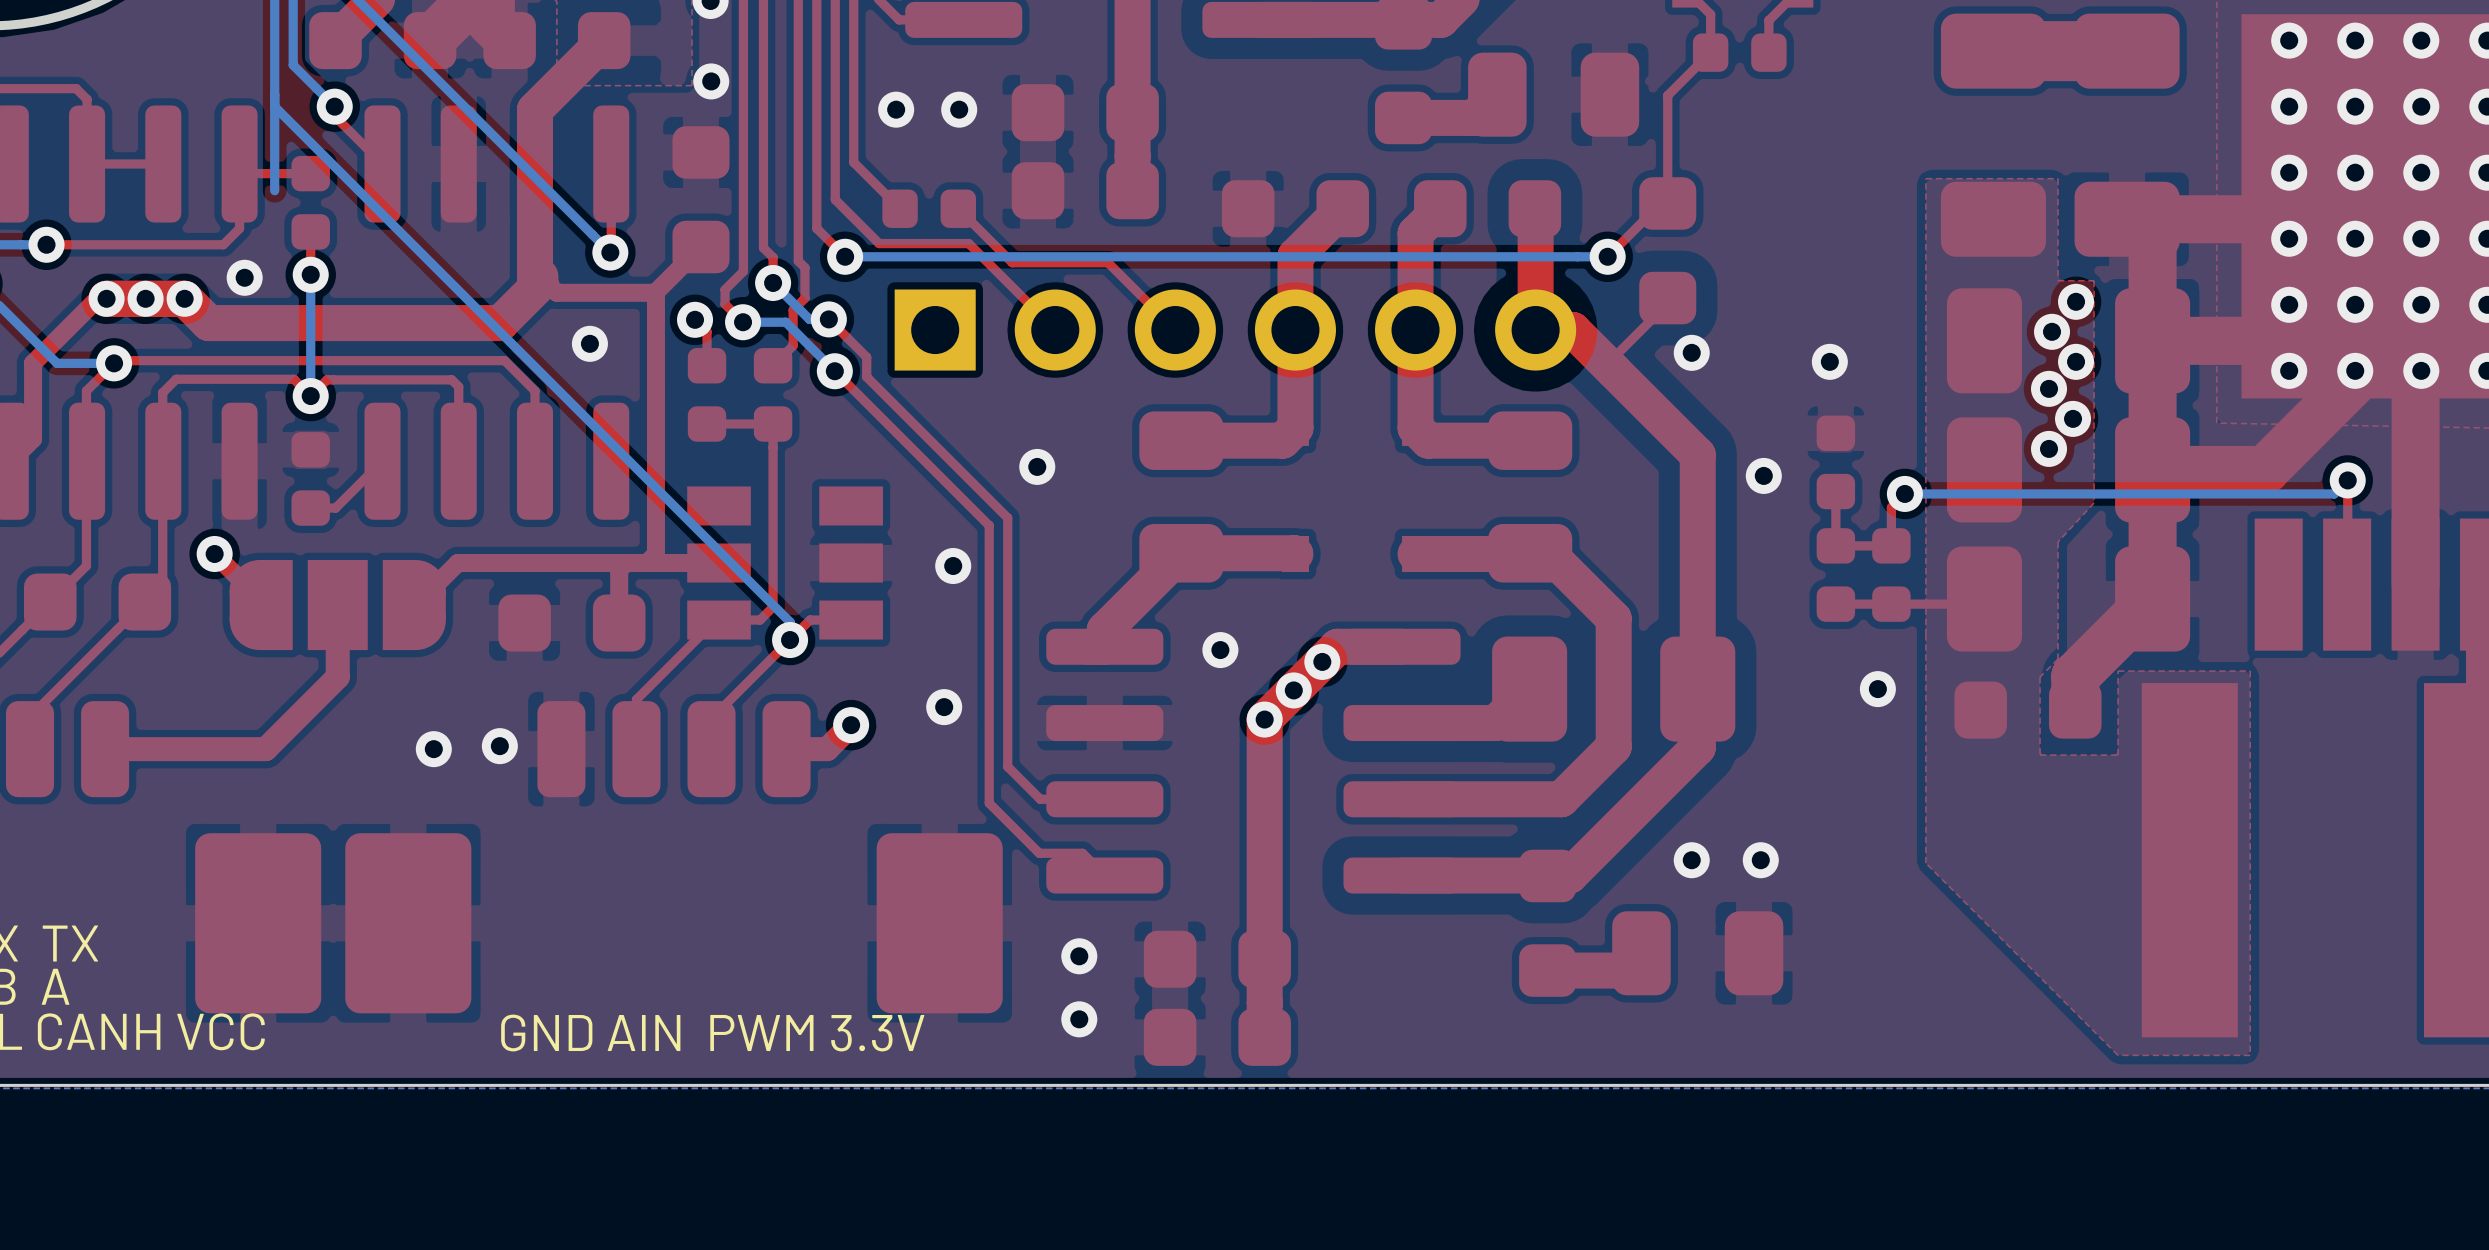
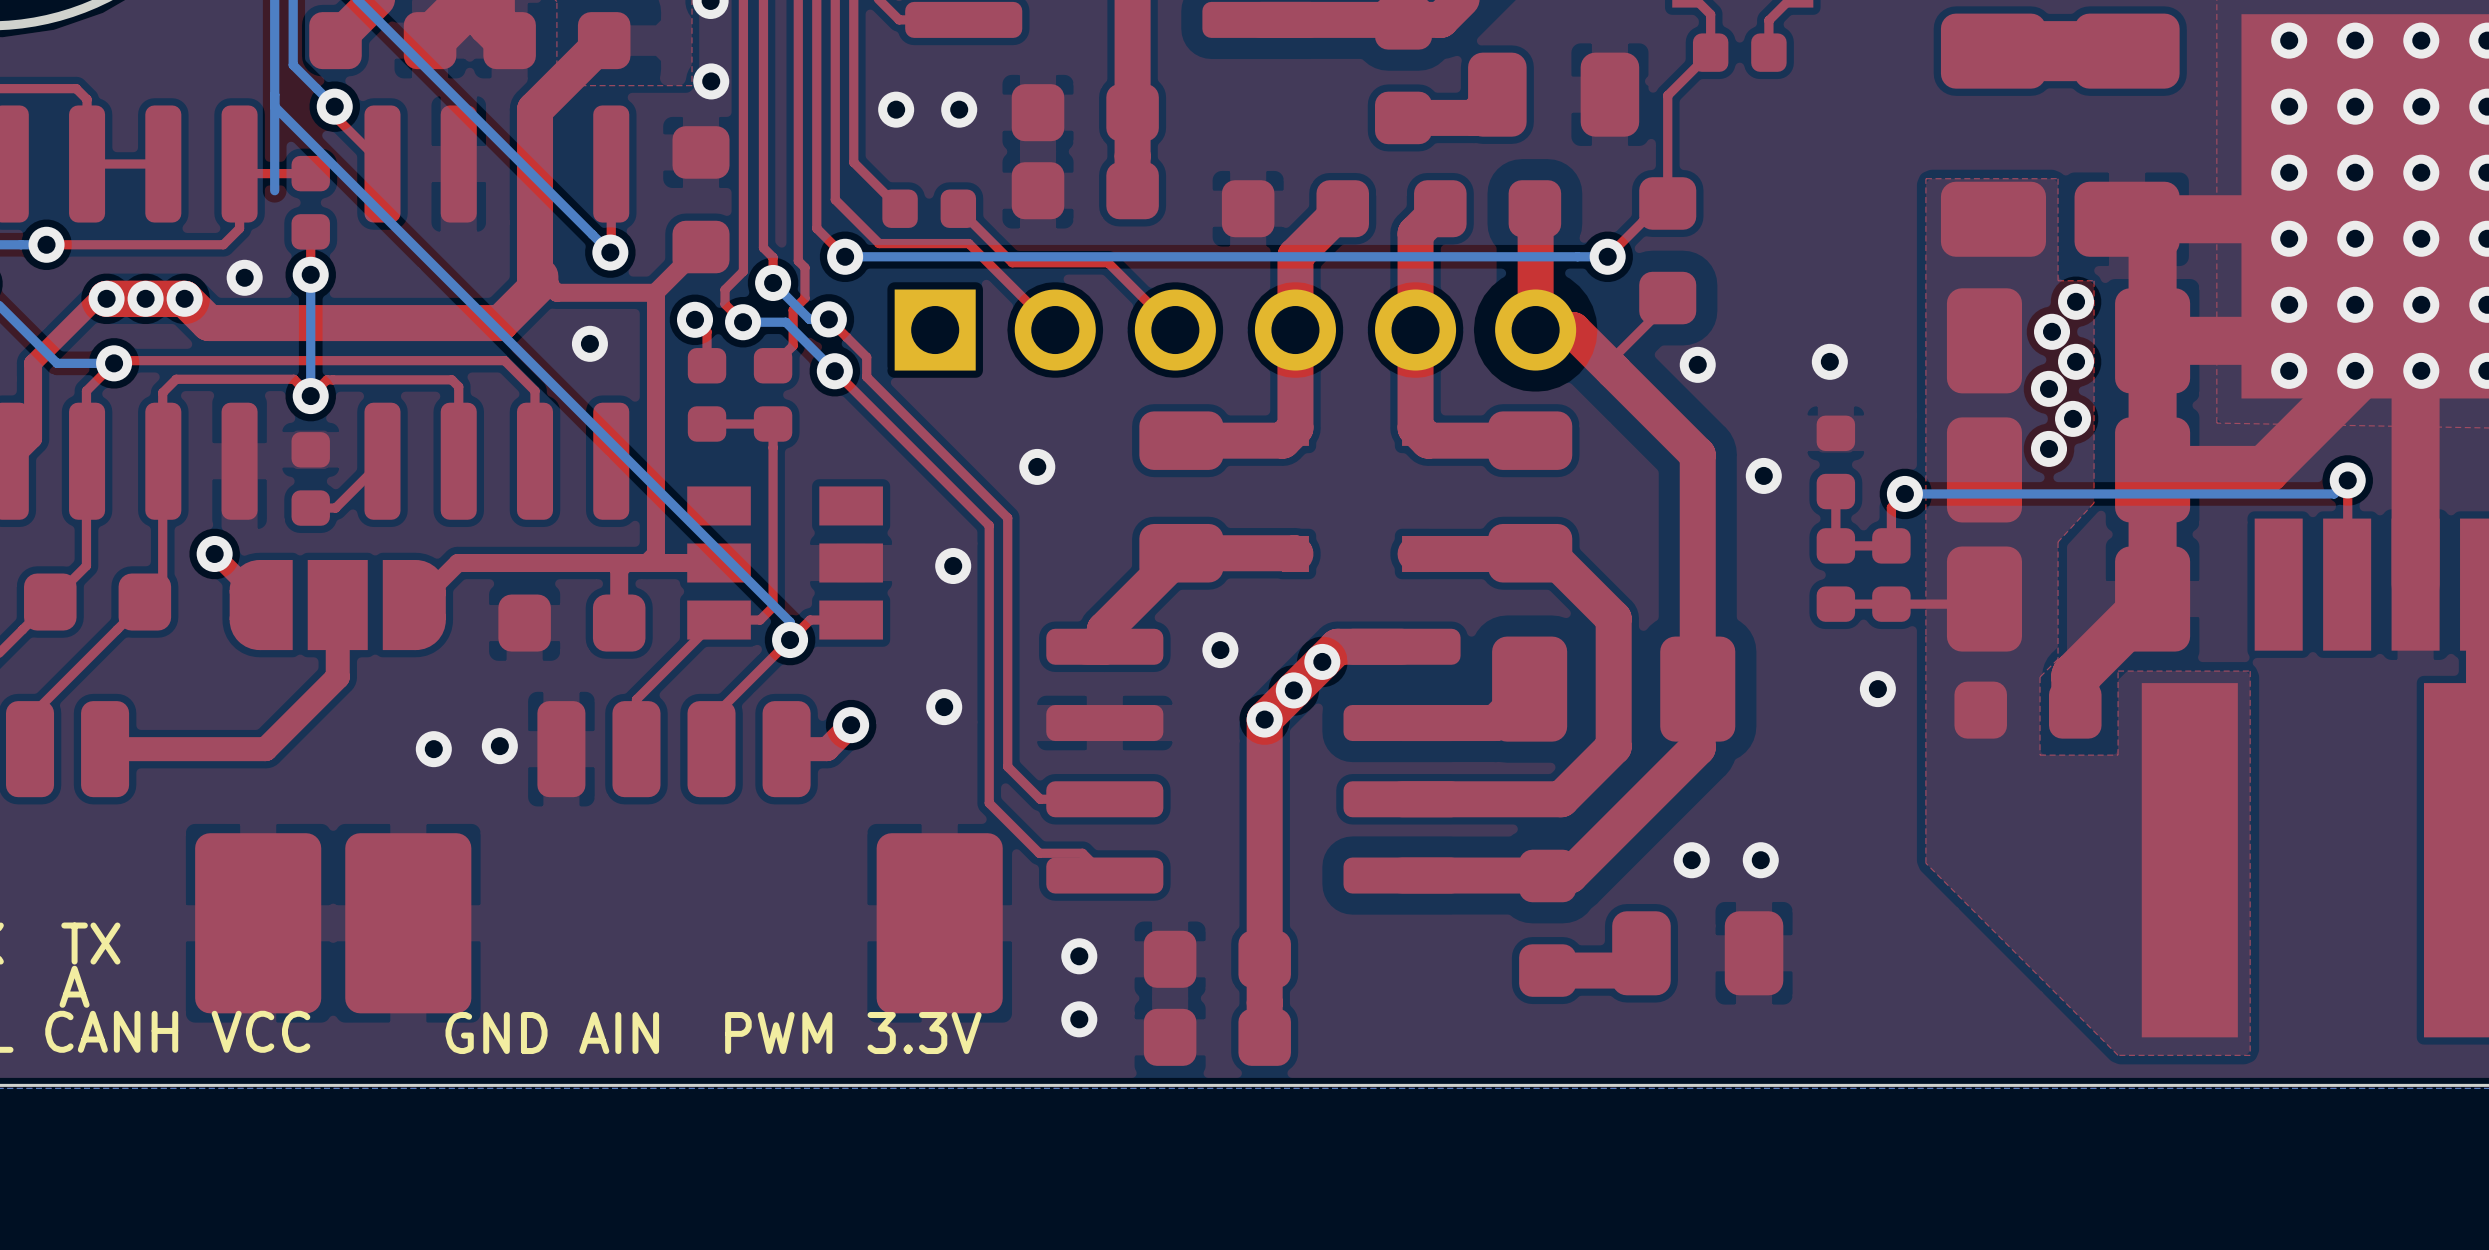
via position: (1691, 352) -> (1697, 364)

